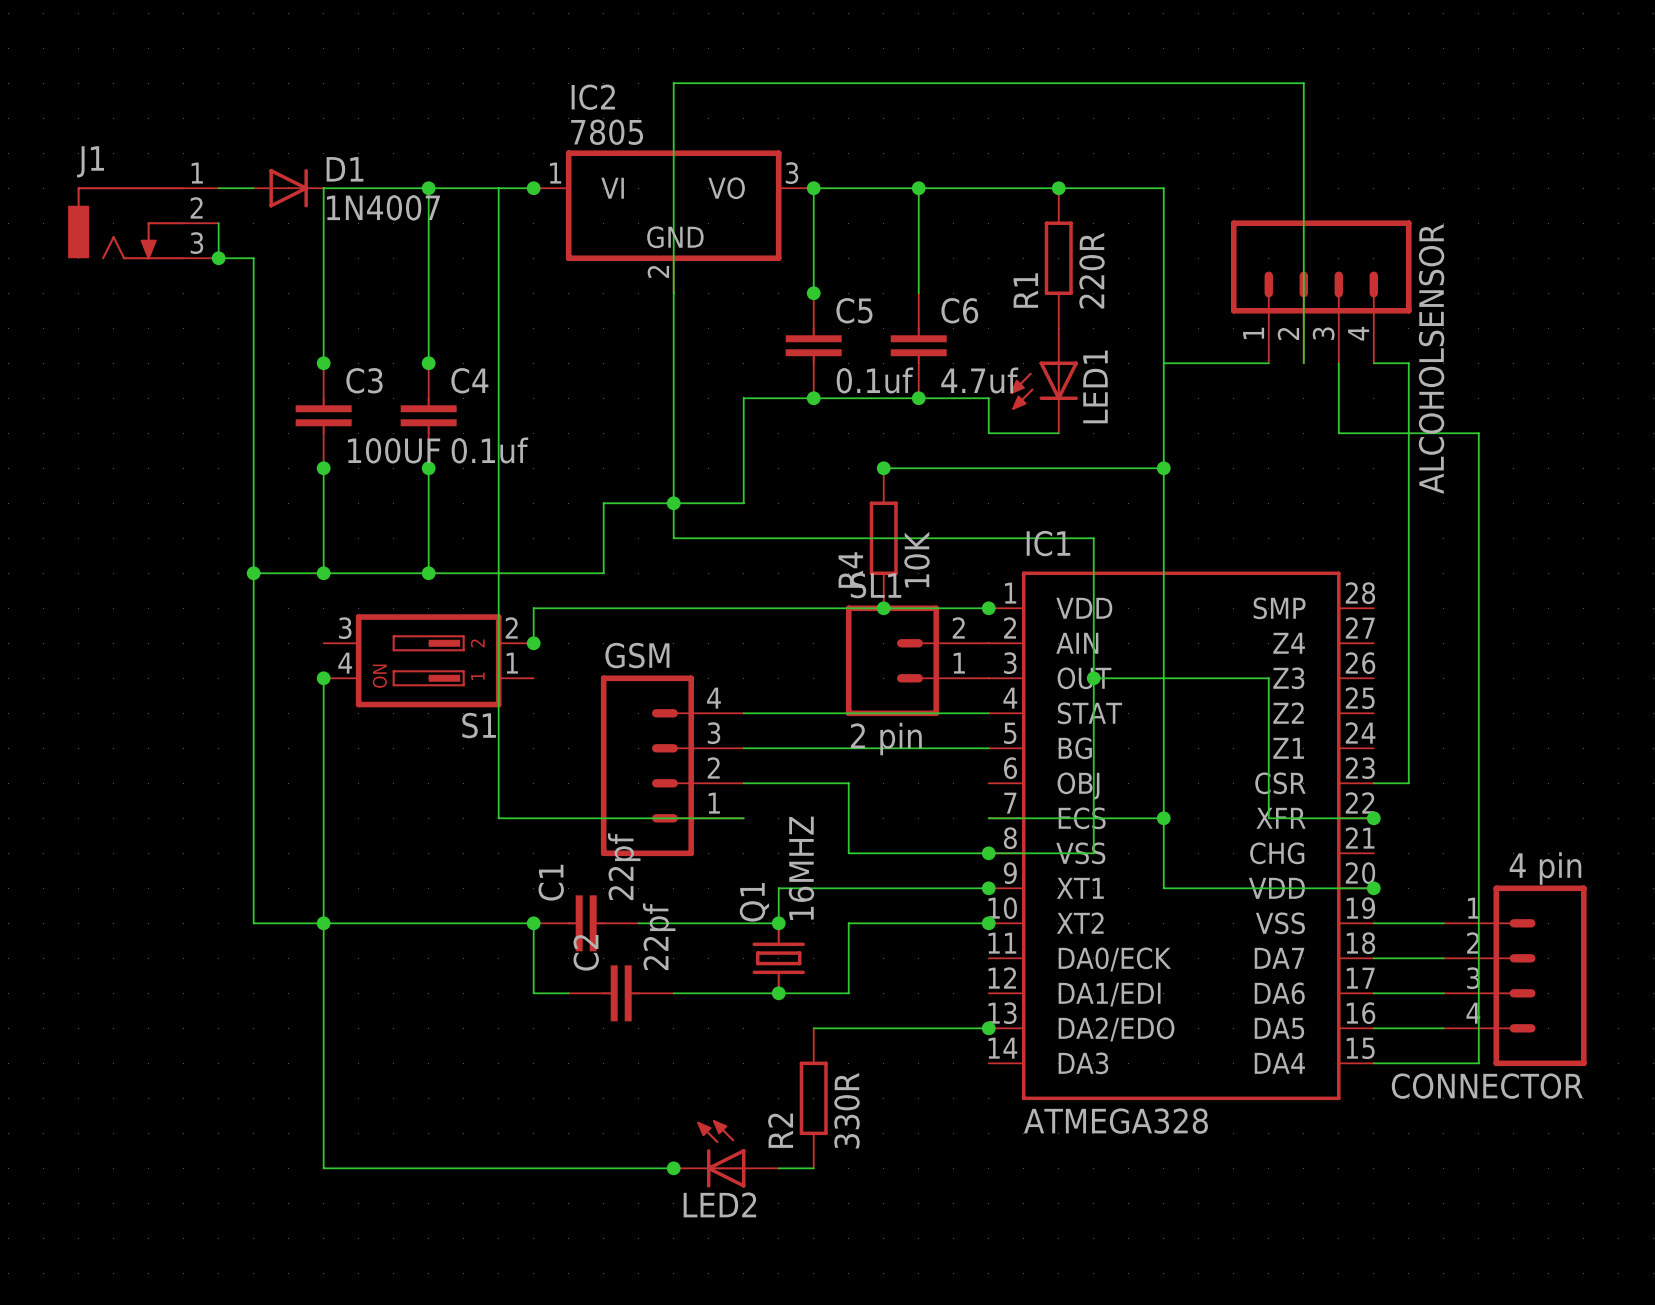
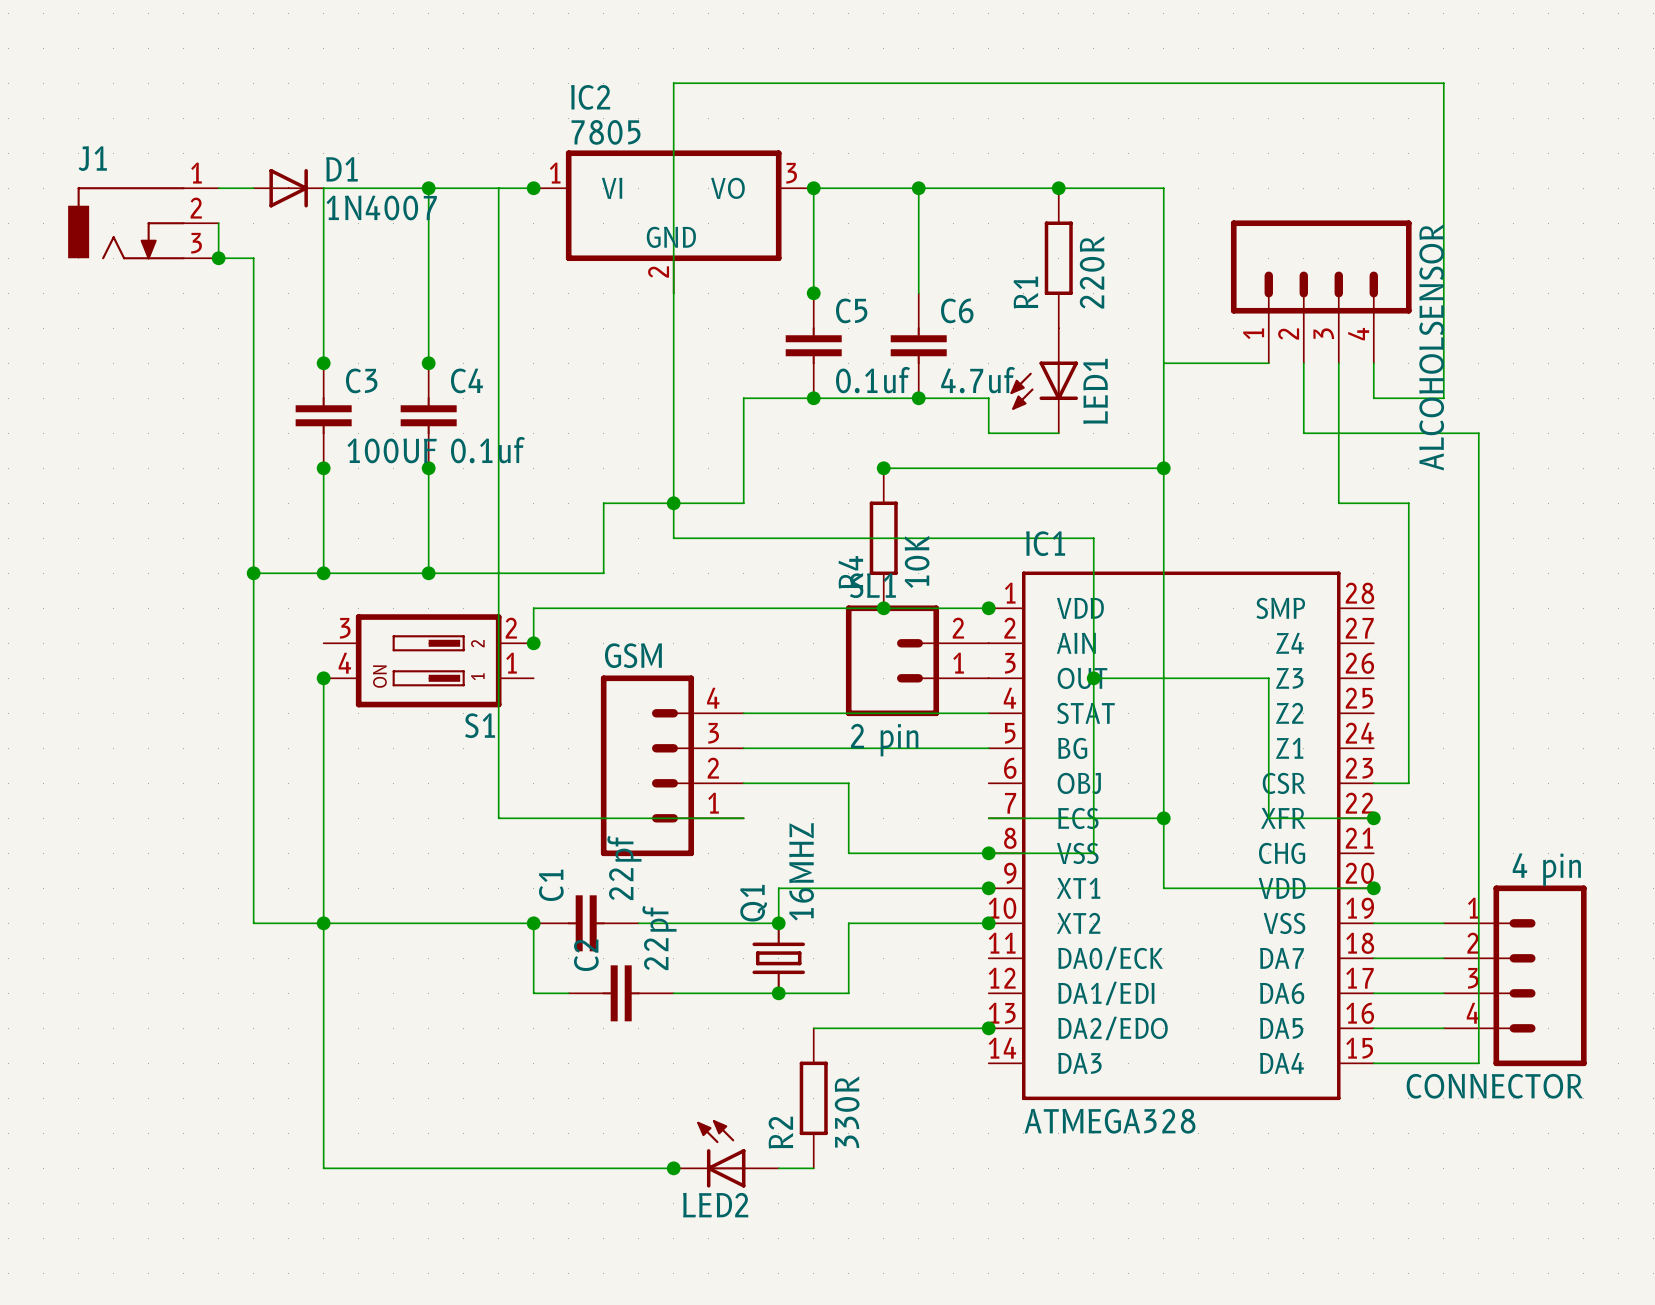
wire: (1303, 83) (1303, 363) -> (1303, 83) (1443, 83) (1443, 398) (1373, 398) (1373, 363)
wire: (1373, 363) (1408, 363) (1408, 503) -> (1303, 363) (1303, 433) (1338, 433) (1338, 503) (1408, 503)

